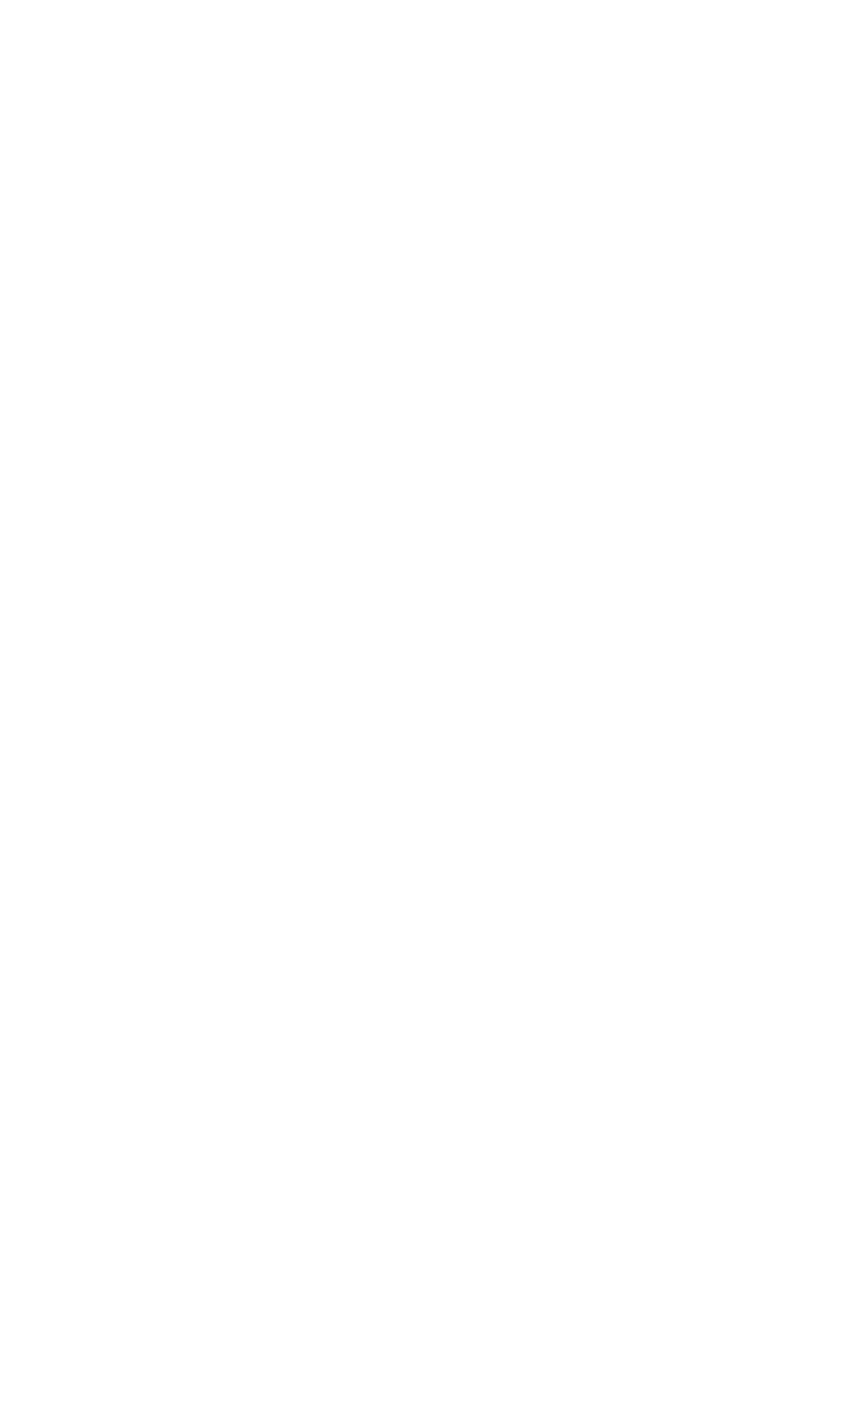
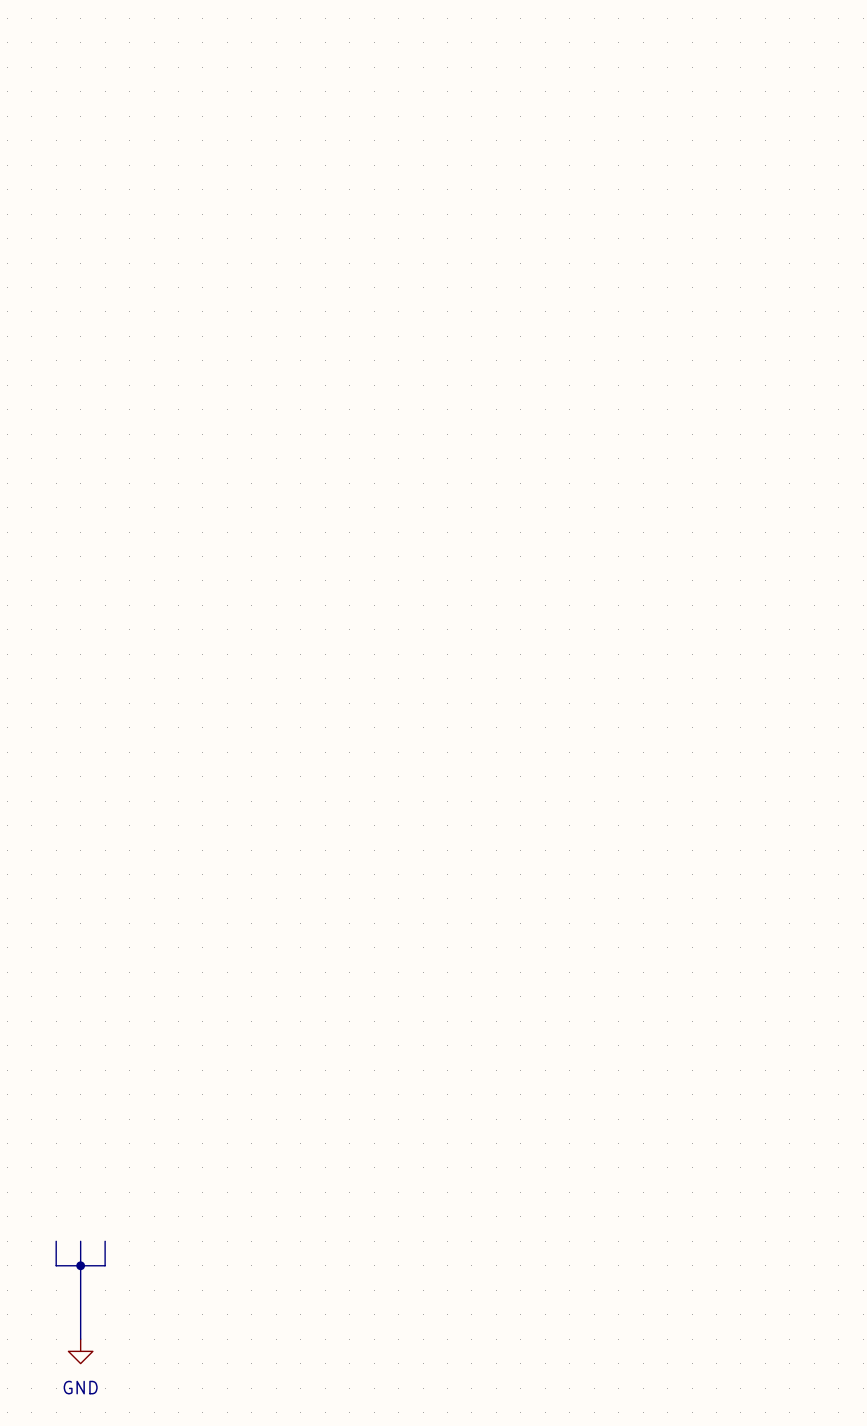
wire: none -> (56, 1241) (56, 1265) (105, 1265) (105, 1241)
wire: none -> (80, 1241) (80, 1339)
junction: none -> (80, 1265)
power symbol: none -> GND (80, 1351)

